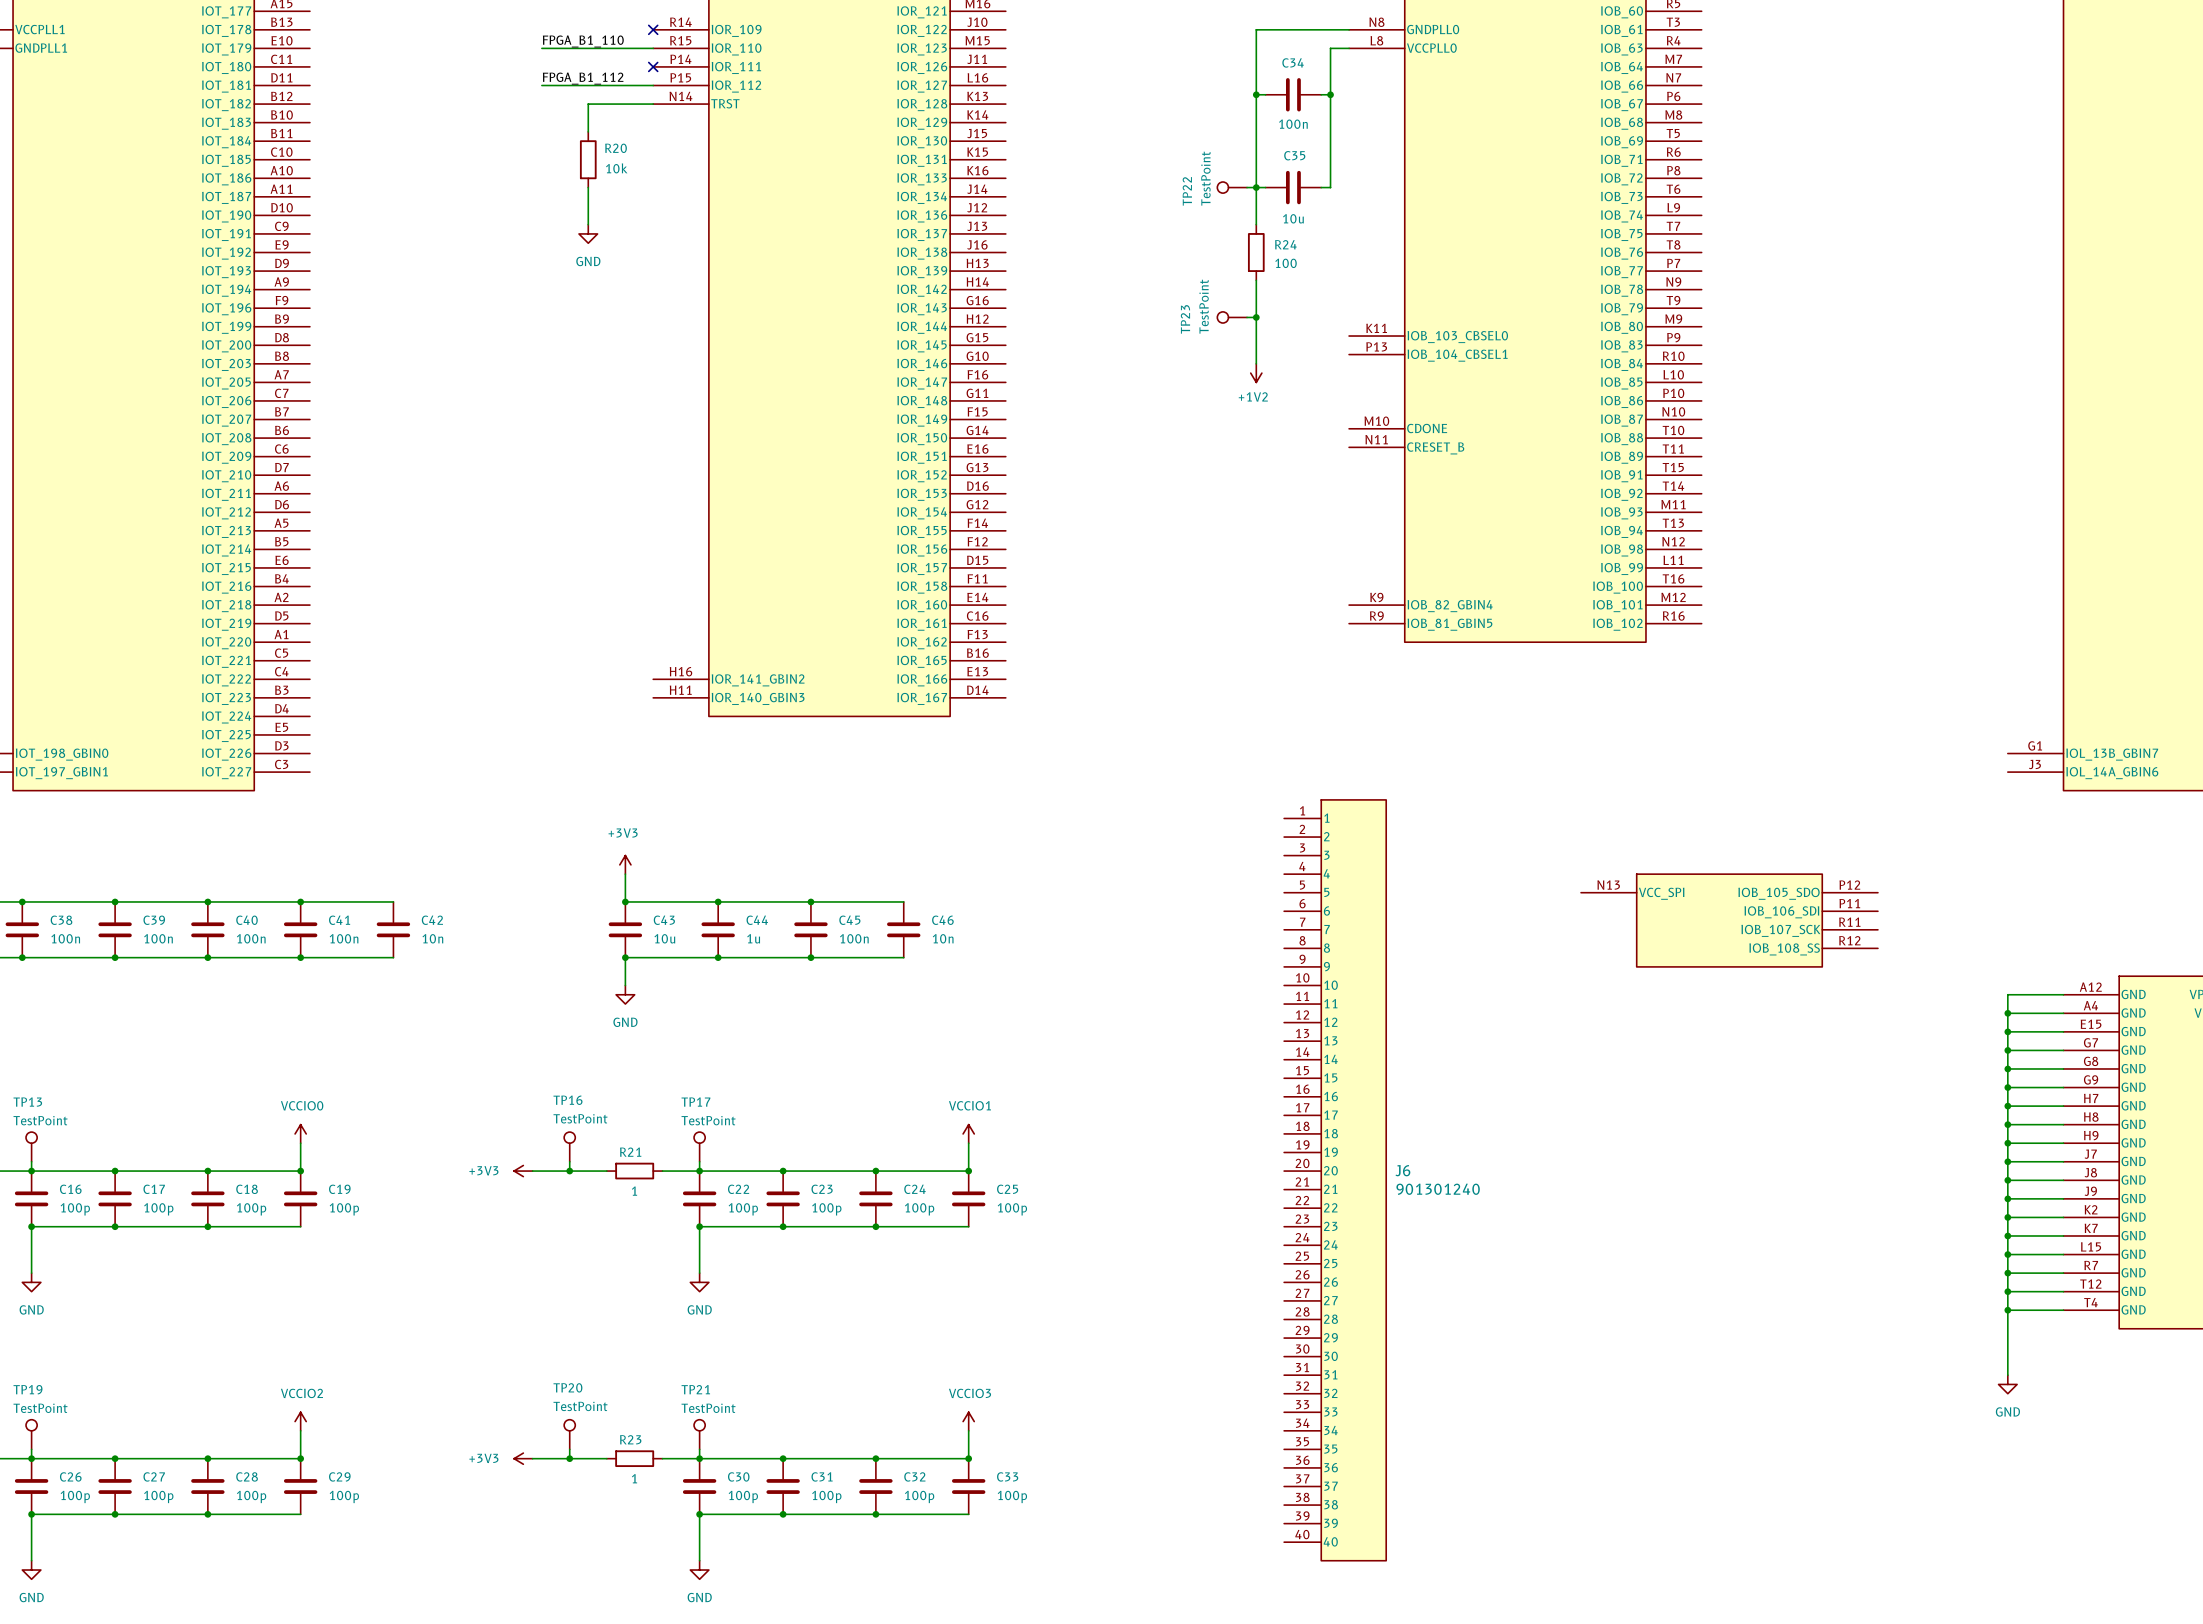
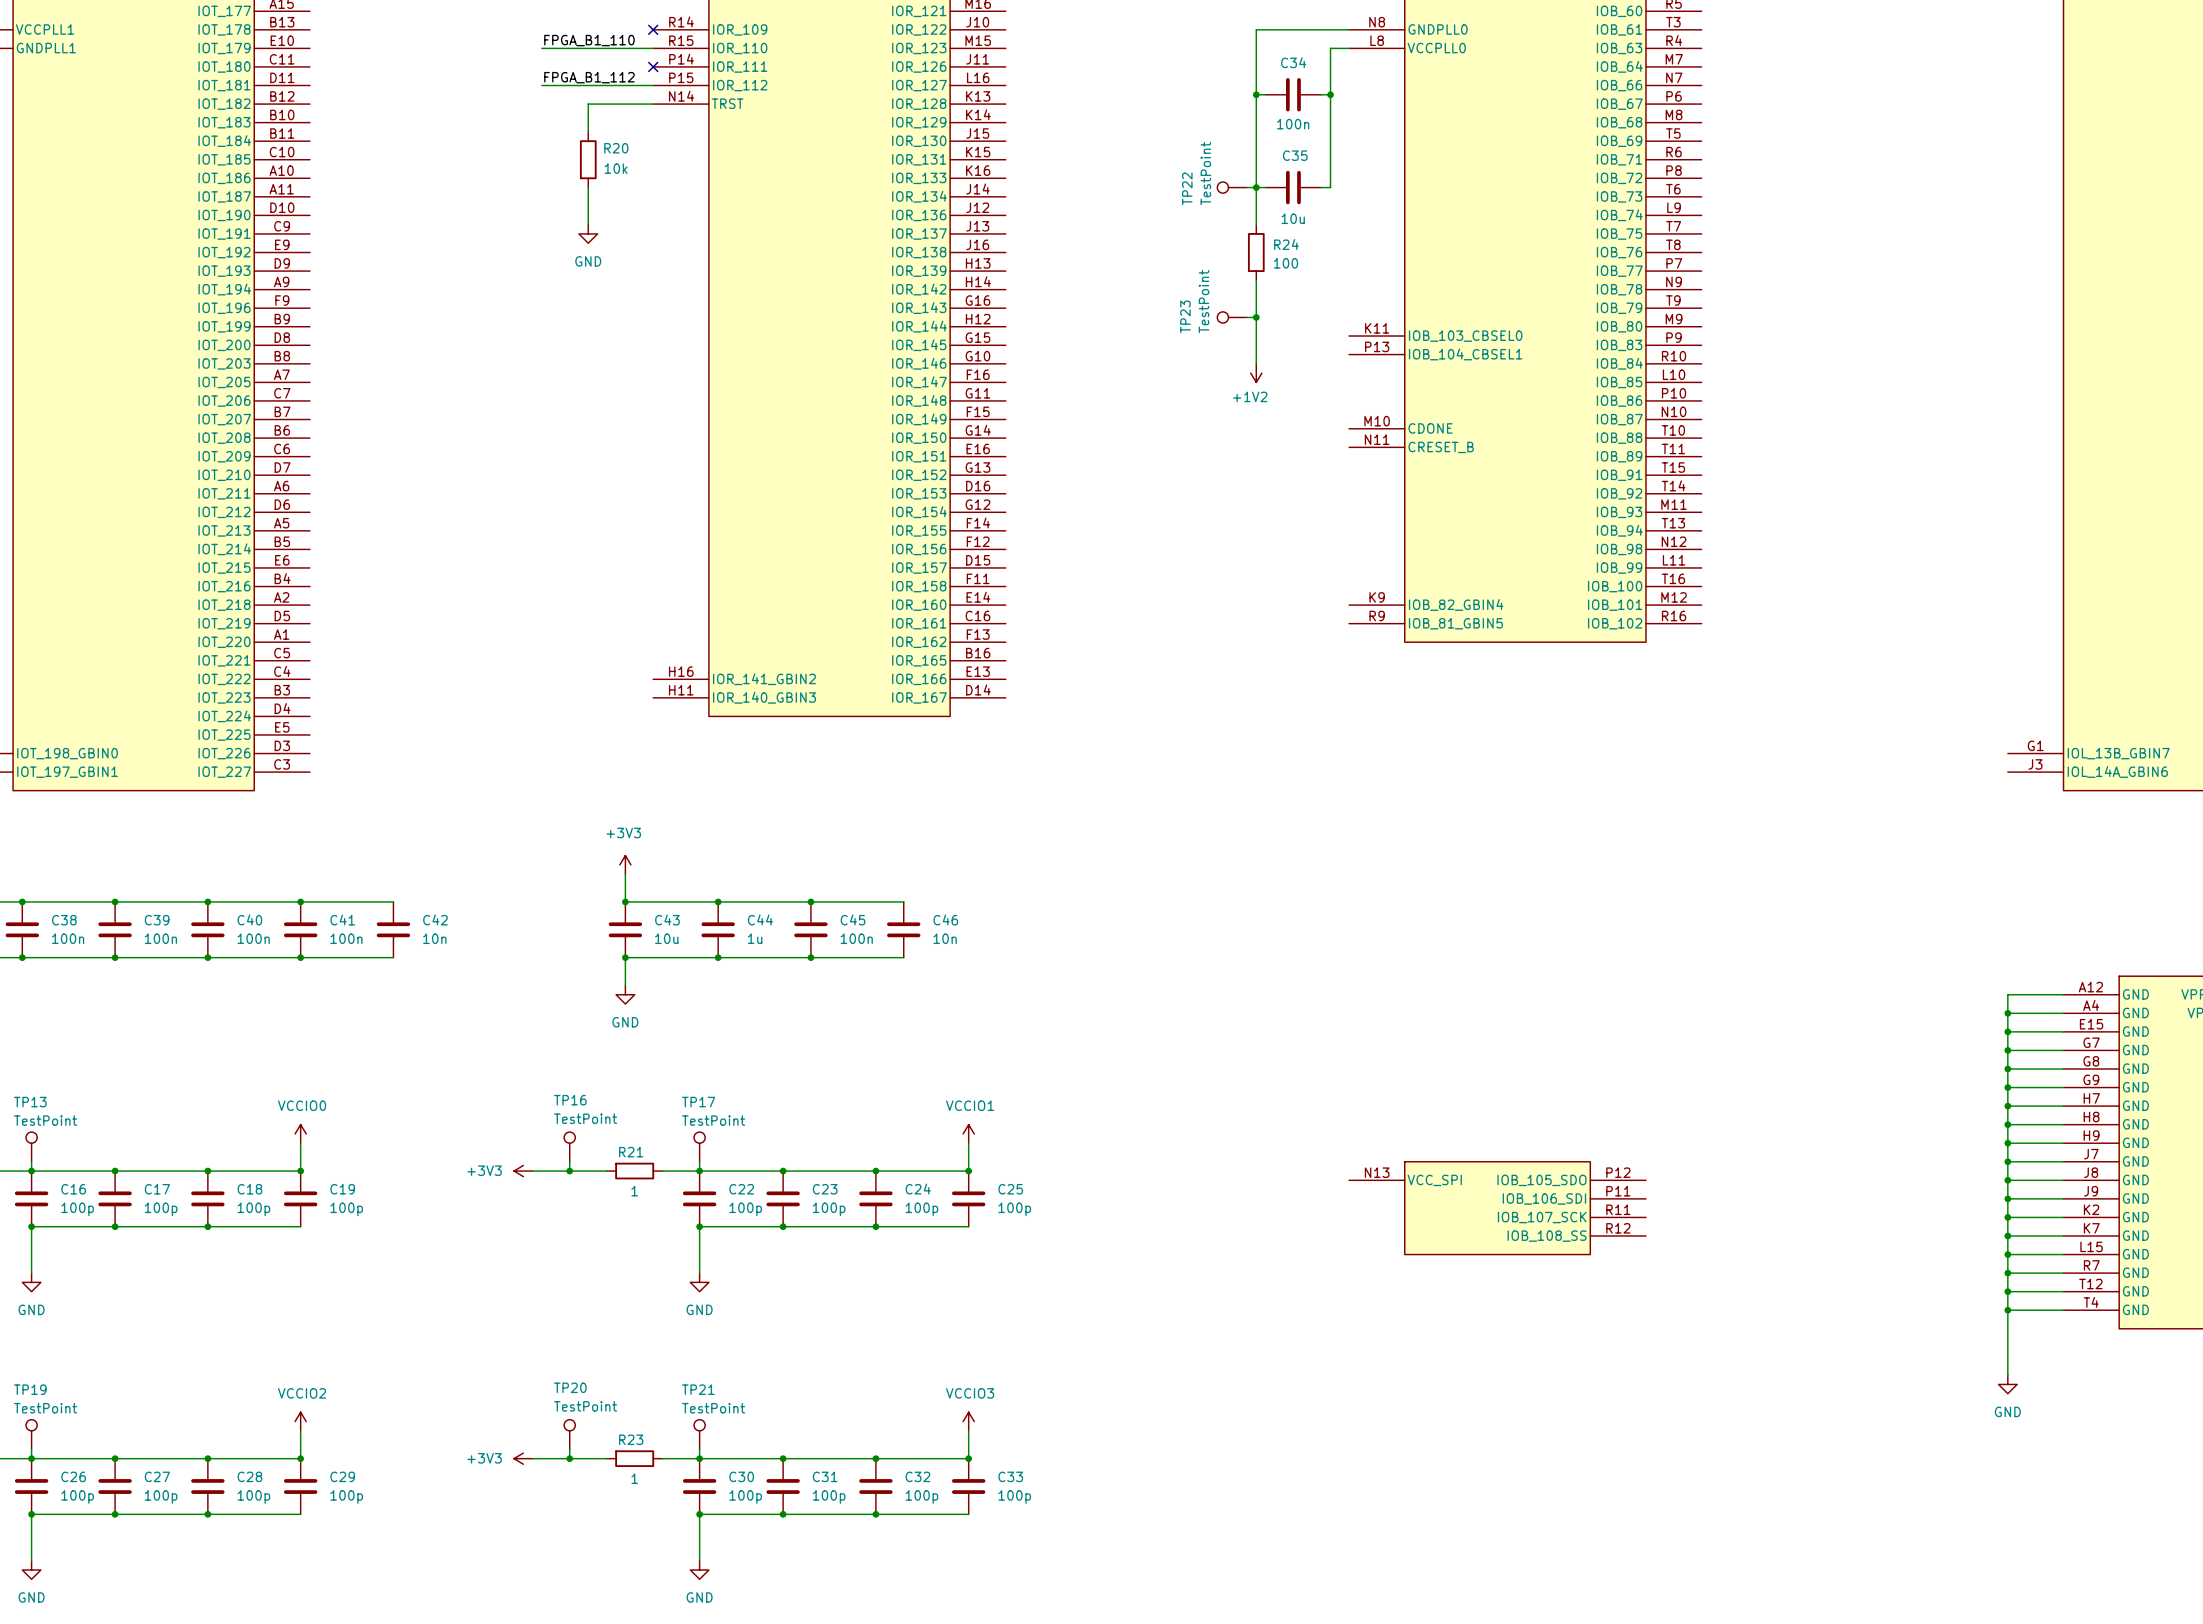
part: (1729, 920) -> none
J6: 901301240 (1335, 1180) -> none
part: none -> (1497, 1208)

